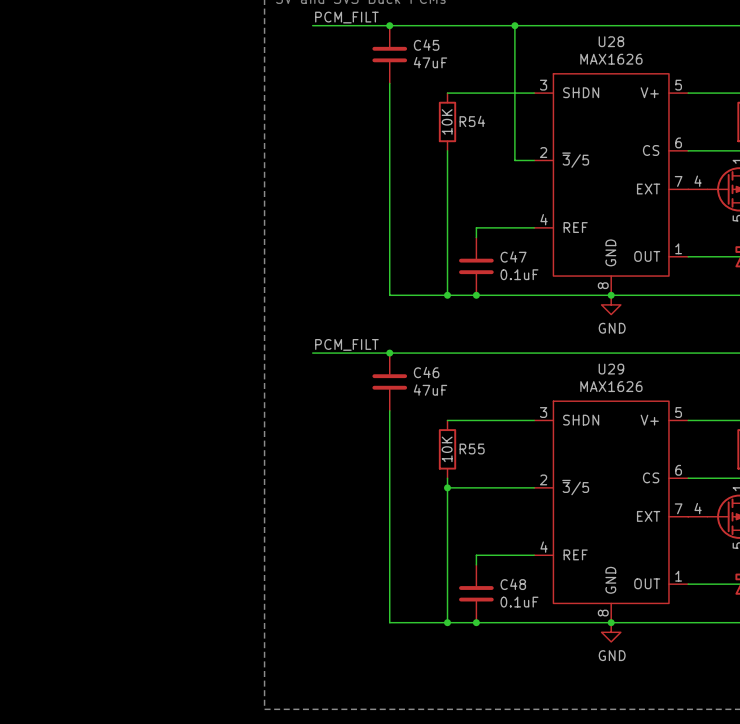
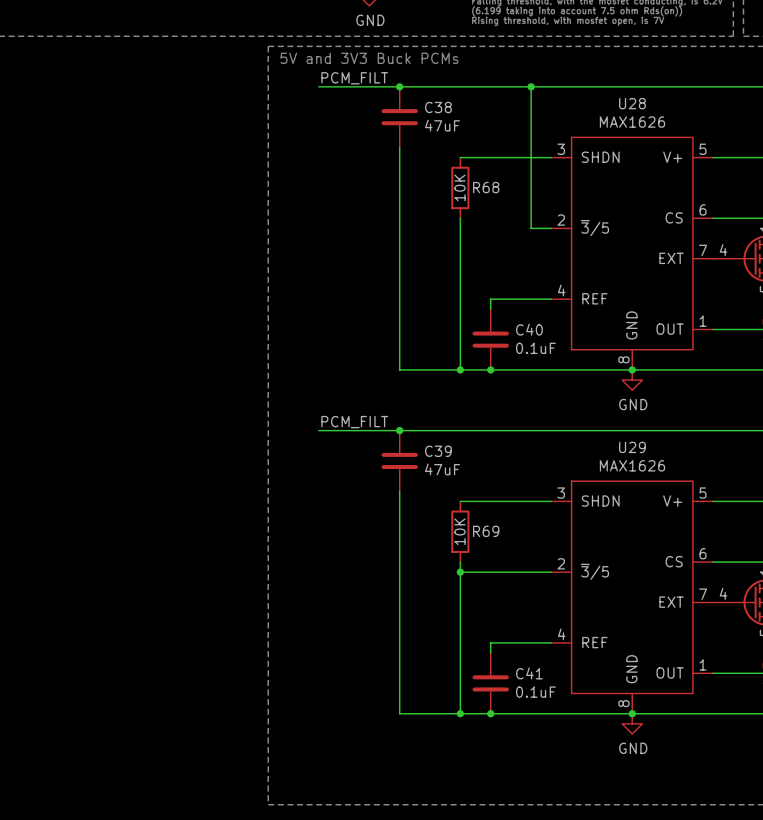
C45 name: C45 (426, 45) -> C38 (438, 107)
R54 name: R54 (472, 121) -> R68 (486, 187)
C47 name: C47 (513, 256) -> C40 (529, 329)
C46 name: C46 (426, 372) -> C39 (438, 451)
R55 name: R55 (472, 448) -> R69 (486, 531)
C48 name: C48 (513, 584) -> C41 (529, 673)

